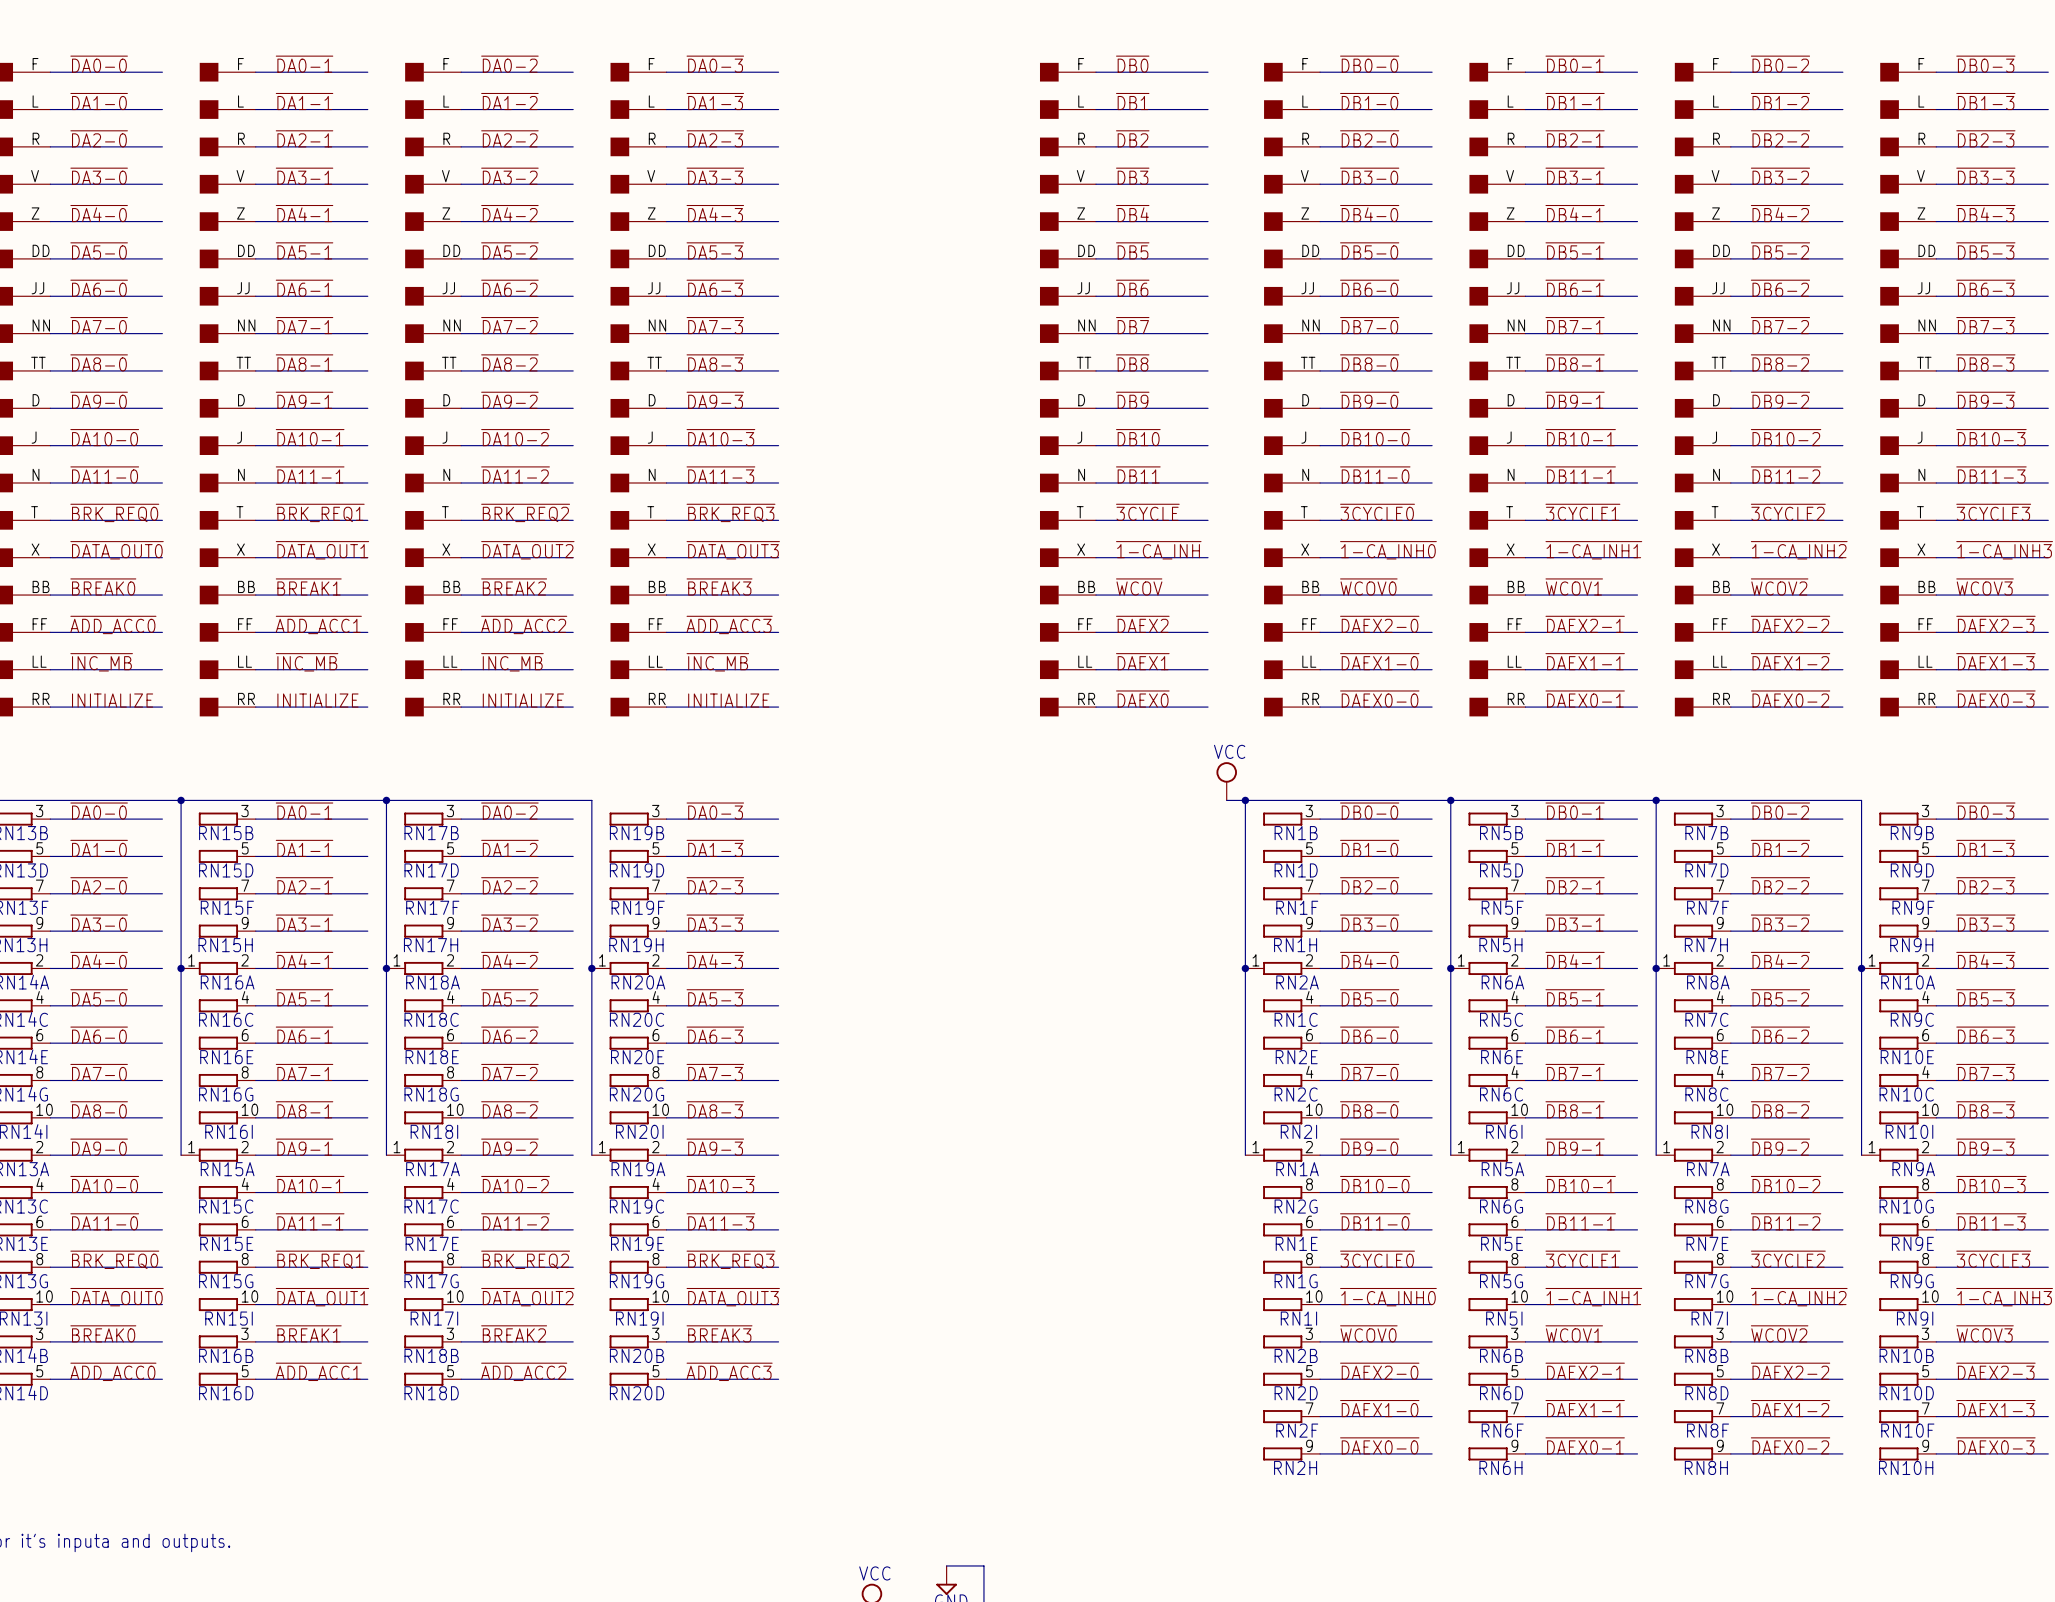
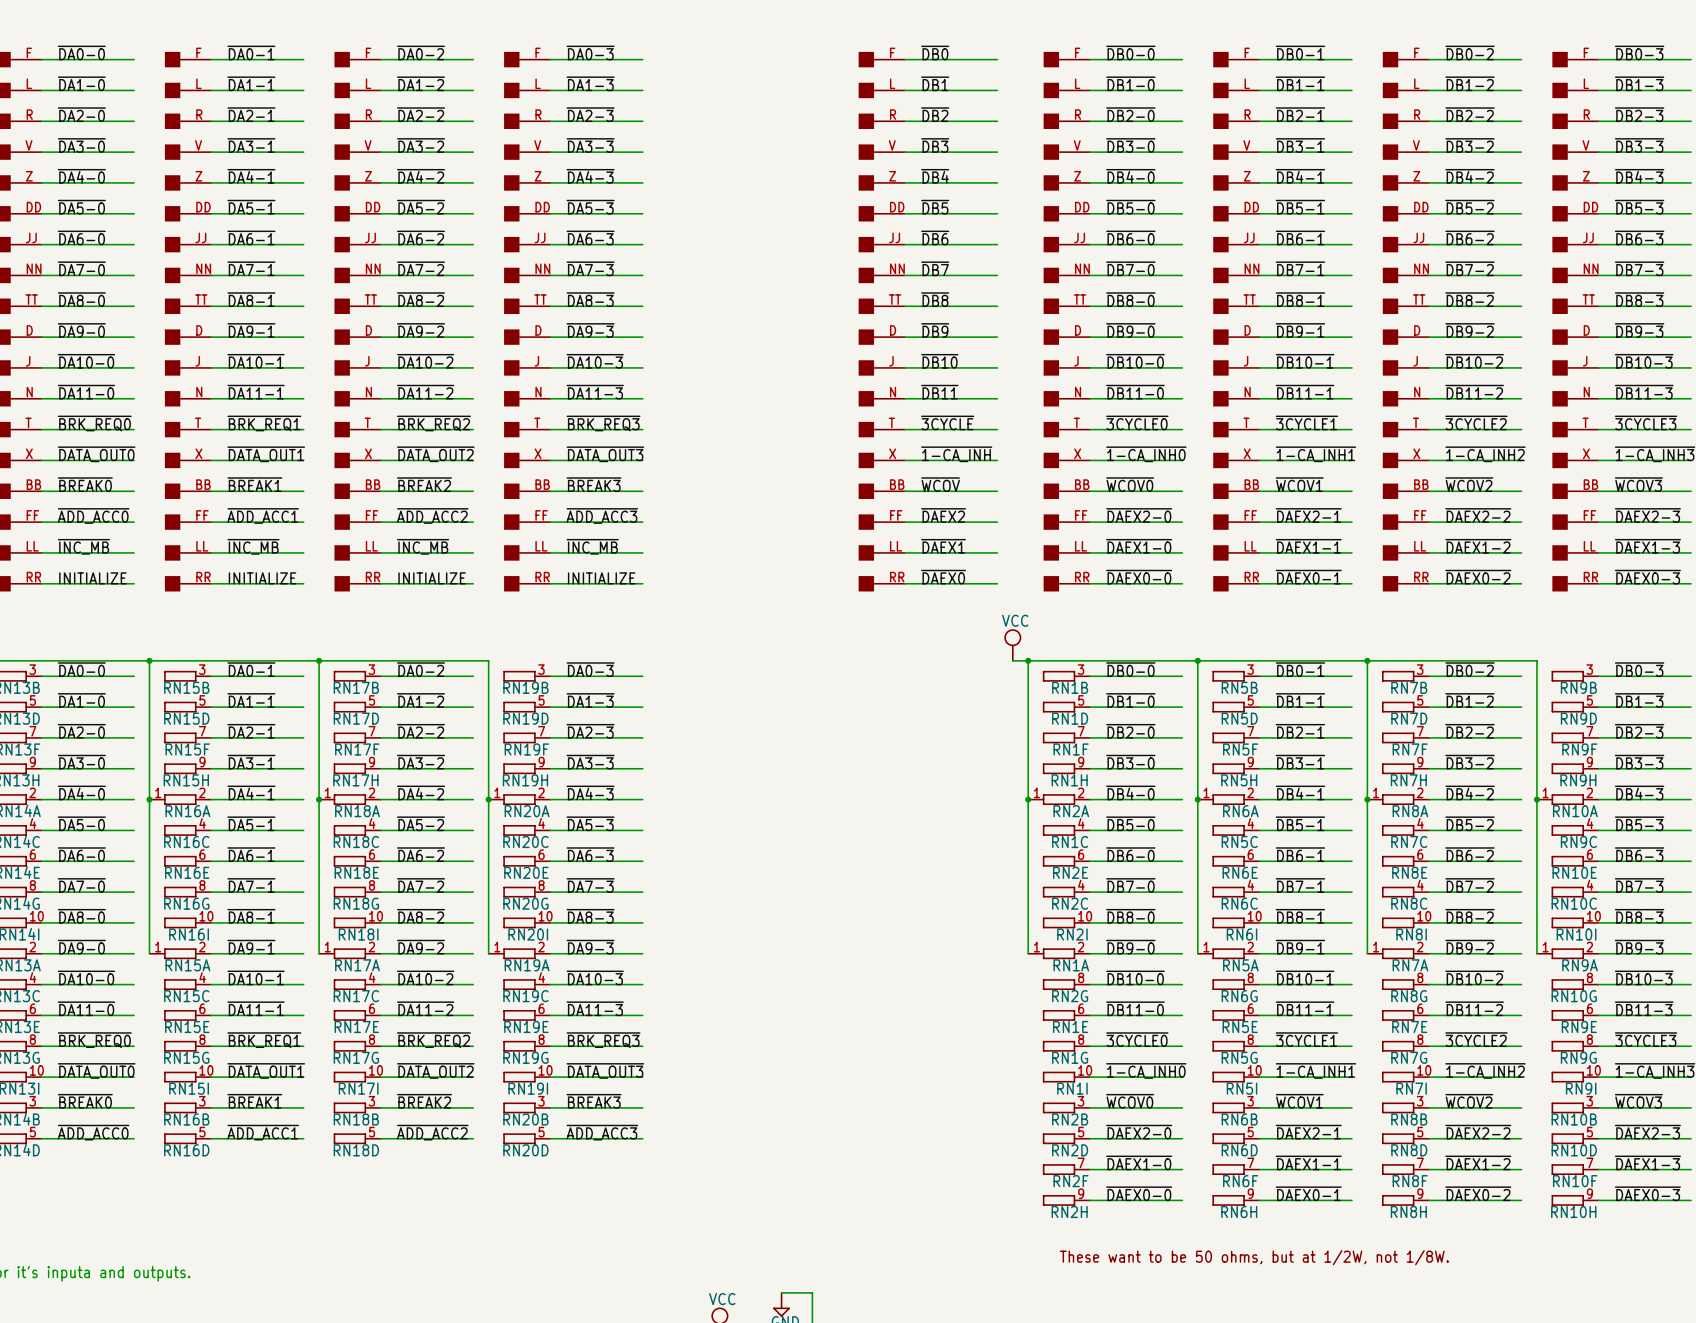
text: none -> These want to be 50 ohms, but at 1/2W, not 1/8W. (1254, 1257)

